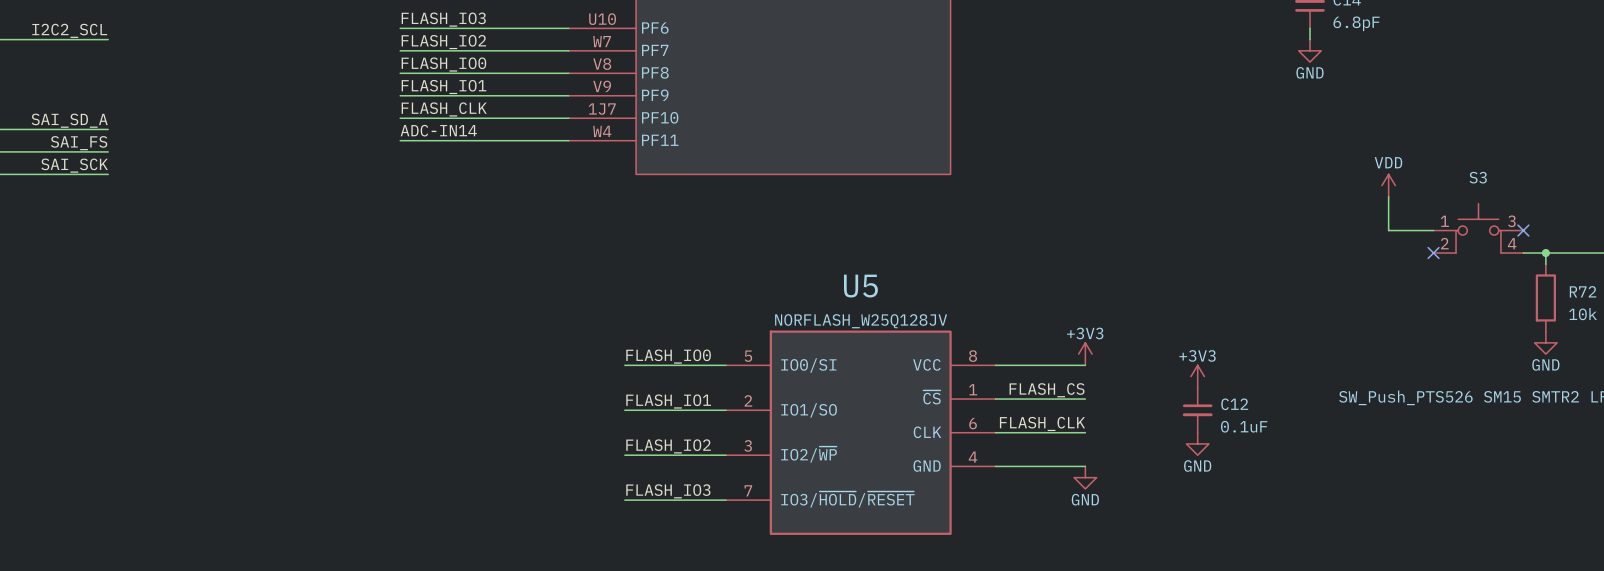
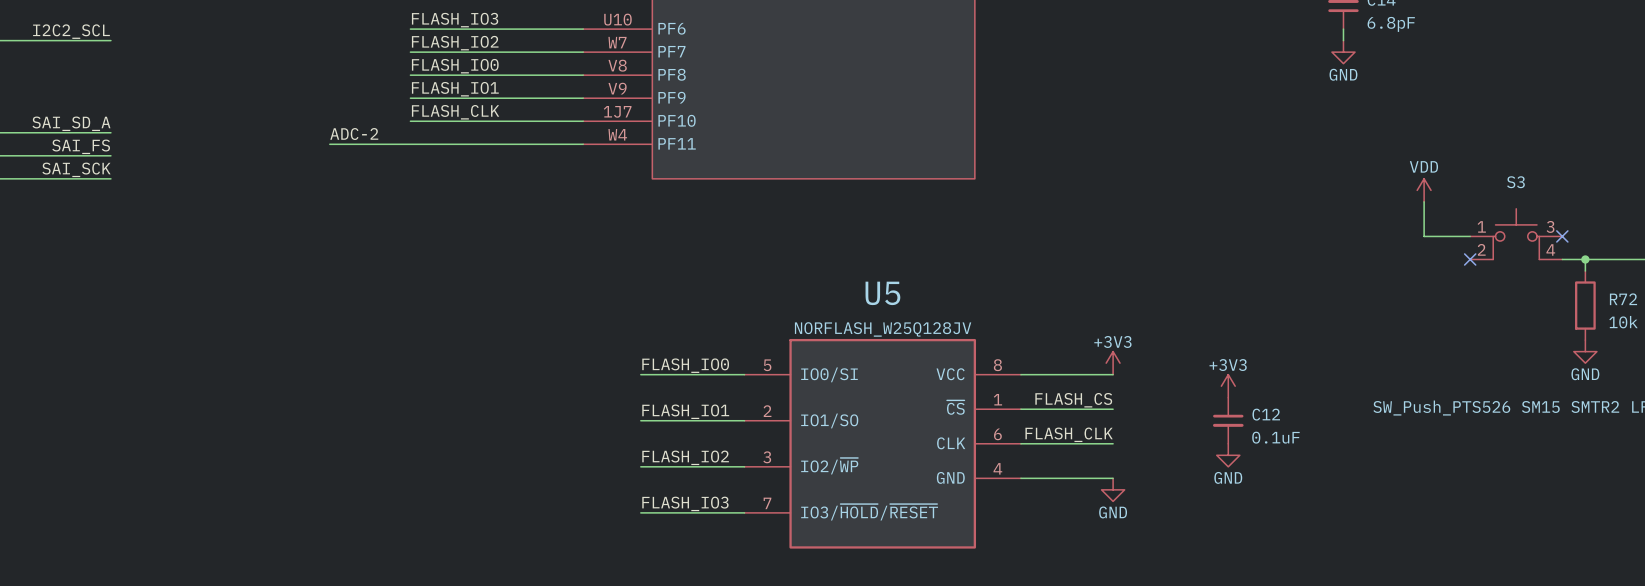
label: none -> ADC-2 (354, 134)
label: ADC-IN14 (438, 130) -> none
wire: none -> (329, 144) (410, 144)

